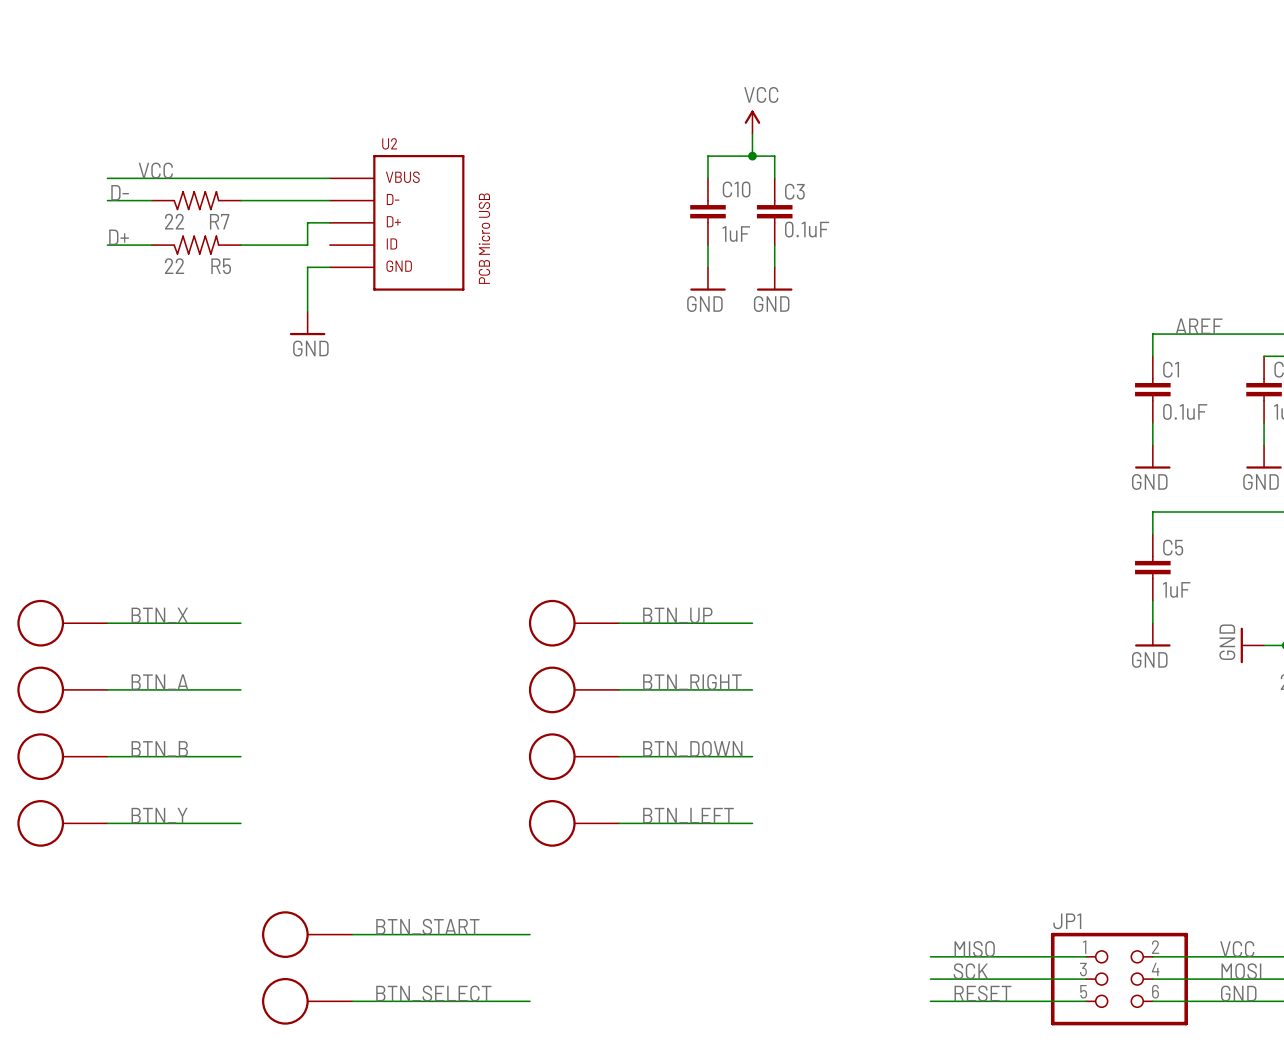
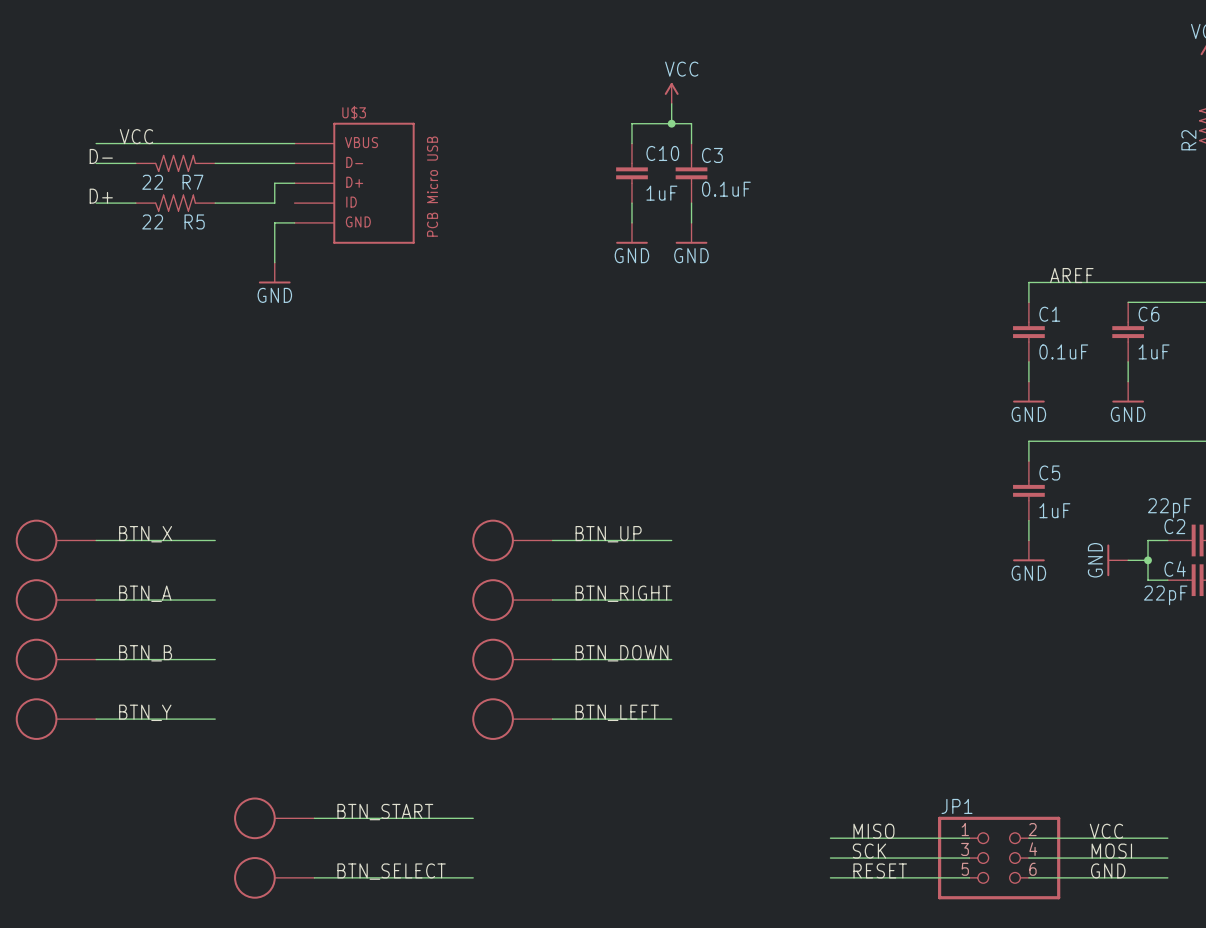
U2 name: U2 (389, 143) -> U$3 (354, 112)

